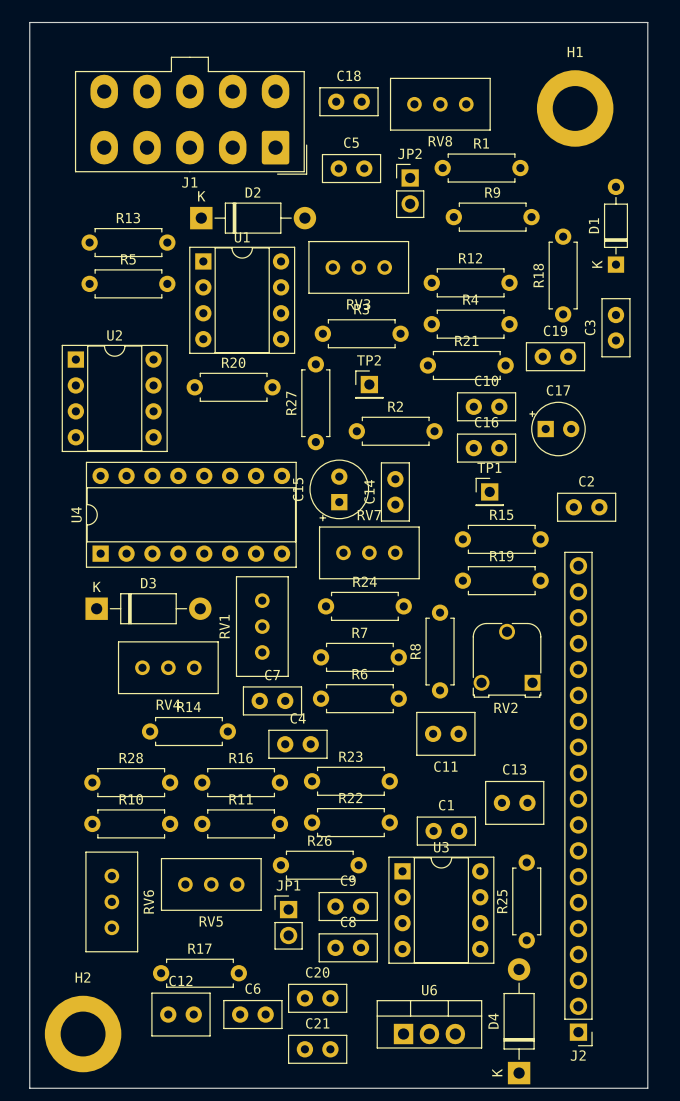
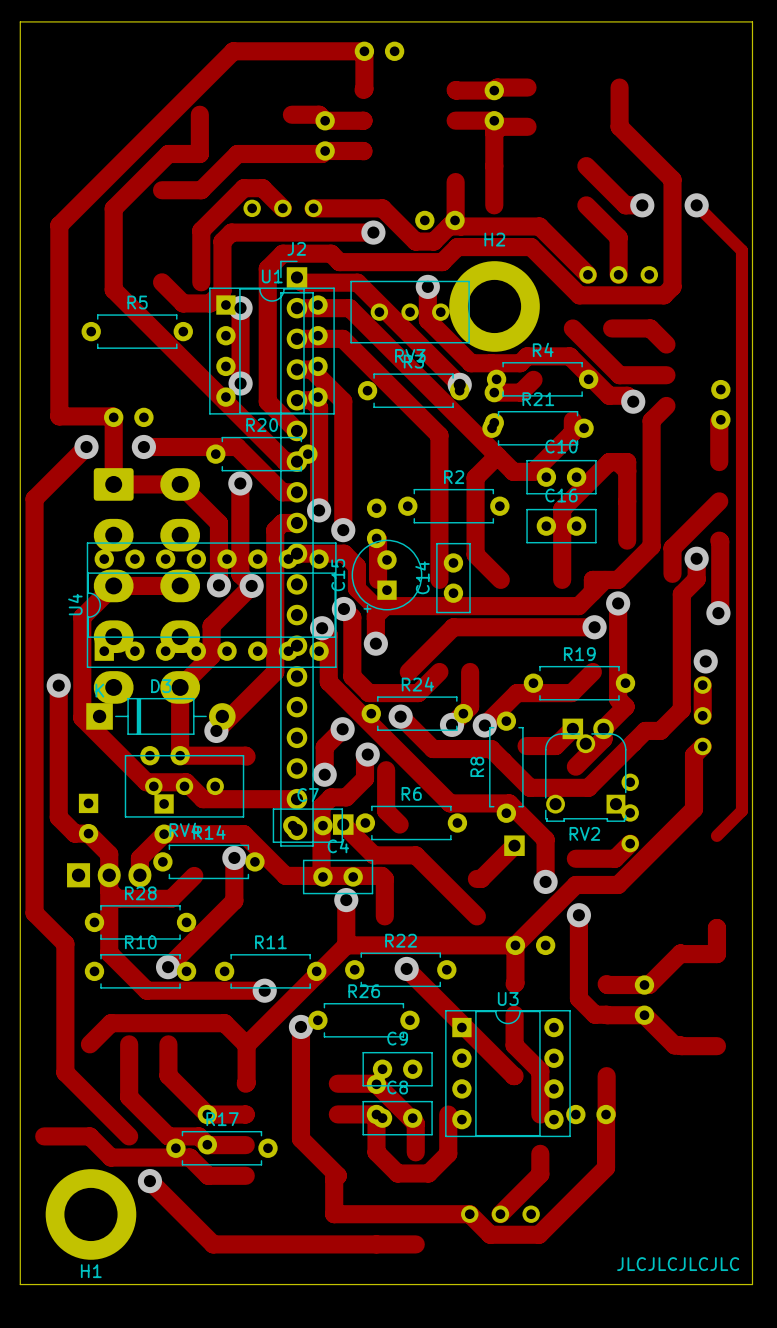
part: none -> (379, 51)
H1 name position: H1 (575, 52) -> H1 (91, 1271)
track: none -> (527, 87) (497, 87) (494, 90) (455, 89)
track: none -> (619, 87) (619, 126) (672, 179) (672, 286) (664, 295) (579, 295) (531, 247) (457, 247) (442, 262) (339, 262) (331, 253) (282, 253) (267, 268) (267, 401) (296, 430)
track: none -> (363, 89) (364, 51) (233, 51) (59, 225) (59, 416) (112, 416) (113, 484) (180, 484) (218, 523) (218, 585)
track: none -> (199, 114) (199, 154) (168, 154) (113, 208) (113, 289) (285, 461) (296, 461)
track: none -> (291, 114) (319, 114) (325, 120) (363, 120)
C18 side: top (348, 101) -> bottom (494, 105)
RV8: (440, 104) -> none
track: none -> (455, 120) (494, 120) (500, 126)
track: none -> (494, 120) (494, 205)
H1 position: (575, 108) -> (90, 1214)
track: none -> (500, 126) (527, 126)
J1: (191, 115) -> none
part: none -> (325, 135)
track: none -> (363, 151) (325, 150) (322, 154) (237, 154) (201, 190) (162, 190)
track: none -> (586, 166) (625, 205) (642, 205)
track: none -> (455, 182) (455, 219) (433, 241) (415, 241) (382, 208) (313, 208)
C5 side: top (351, 168) -> bottom (494, 407)
R1: (481, 168) -> none
track: none -> (586, 205) (618, 237) (618, 274)
via: none -> (642, 205)
track: none -> (696, 205) (741, 250) (741, 810) (716, 835)
via: none -> (696, 205)
track: none -> (282, 208) (262, 188) (243, 188) (201, 230) (201, 282)
part: none -> (282, 208)
part: none -> (439, 220)
JP2: (410, 190) -> none
track: none -> (448, 226) (539, 226) (587, 274)
track: none -> (373, 232) (231, 232) (222, 241) (222, 291) (210, 303) (183, 303) (162, 282)
via: none -> (373, 232)
R9: (492, 217) -> none
D2: (253, 218) -> none
D1: (615, 225) -> none
part: none -> (618, 274)
track: none -> (296, 277) (302, 282) (357, 282) (459, 384)
R13: (128, 242) -> none
track: none -> (427, 286) (427, 320) (471, 363) (520, 363) (527, 356) (569, 356) (609, 395) (627, 395) (633, 401)
via: none -> (427, 286)
track: none -> (240, 308) (240, 383)
via: none -> (240, 308)
track: none -> (296, 308) (349, 308) (513, 471) (533, 471) (572, 432) (572, 420)
R18: (563, 275) -> none
track: none -> (572, 328) (619, 375) (666, 375)
track: none -> (612, 328) (650, 328) (666, 344)
R12: (470, 282) -> none
track: none -> (296, 338) (342, 338) (439, 435) (439, 579)
track: none -> (296, 369) (311, 369) (343, 401) (343, 530)
track: none -> (533, 379) (520, 392) (494, 392)
via: none -> (240, 383)
C3: (615, 327) -> none
via: none -> (459, 384)
track: none -> (296, 400) (311, 400) (319, 407) (319, 510)
via: none -> (633, 401)
part: none -> (720, 404)
track: none -> (666, 405) (651, 420) (651, 546) (618, 579) (592, 579) (592, 591)
part: none -> (128, 417)
C19: (555, 356) -> none
track: none -> (720, 419) (719, 421) (719, 462)
track: none -> (86, 446) (34, 498) (34, 913) (65, 943) (65, 1072) (129, 1136)
via: none -> (86, 446)
track: none -> (143, 446) (237, 446) (282, 492) (296, 492)
via: none -> (143, 446)
TP2: (369, 384) -> none
track: none -> (497, 455) (475, 477) (475, 554) (500, 579)
U2: (114, 398) -> none
R27: (315, 403) -> none
track: none -> (240, 483) (240, 574) (251, 585) (211, 626) (211, 656) (180, 687) (180, 755) (246, 756)
via: none -> (240, 483)
track: none -> (719, 501) (672, 548) (672, 573)
C17: (557, 429) -> none
via: none -> (319, 510)
track: none -> (296, 522) (282, 522) (275, 530) (275, 672) (216, 730)
part: none -> (376, 523)
via: none -> (343, 530)
track: none -> (376, 538) (378, 579)
track: none -> (627, 540) (627, 462) (609, 462) (562, 509) (562, 579)
track: none -> (719, 540) (720, 611) (718, 613)
track: none -> (296, 553) (344, 553) (356, 566) (356, 588) (375, 607) (375, 643)
track: none -> (696, 558) (696, 579) (681, 594) (681, 709) (660, 730) (645, 730) (588, 787) (530, 787) (491, 749) (433, 749) (400, 716)
via: none -> (696, 558)
TP1: (489, 491) -> none
track: none -> (604, 579) (578, 606) (374, 606)
part: none -> (146, 585)
track: none -> (180, 585) (113, 585) (82, 617) (82, 717) (146, 782) (186, 782) (203, 799) (296, 799)
via: none -> (218, 585)
via: none -> (251, 585)
C2: (586, 507) -> none
track: none -> (618, 603) (618, 699) (625, 706) (603, 728) (603, 739) (575, 766)
via: none -> (618, 603)
track: none -> (343, 608) (352, 617) (352, 676) (368, 693) (418, 693) (439, 671)
via: none -> (343, 608)
via: none -> (718, 613)
track: none -> (594, 627) (453, 627) (408, 671)
via: none -> (594, 627)
track: none -> (322, 628) (328, 634) (328, 682) (450, 803) (509, 803) (545, 839) (545, 881)
via: none -> (322, 628)
R15: (501, 539) -> none
via: none -> (375, 643)
RV7: (369, 552) -> none
via: none -> (705, 661)
track: none -> (470, 671) (470, 706) (452, 724)
track: none -> (592, 671) (571, 693) (517, 693) (484, 725)
track: none -> (58, 685) (58, 817) (74, 833) (88, 833) (109, 854) (109, 953) (146, 990) (264, 990)
via: none -> (58, 685)
track: none -> (702, 685) (702, 715)
via: none -> (400, 716)
part: none -> (702, 715)
via: none -> (452, 724)
via: none -> (484, 725)
track: none -> (342, 729) (324, 747) (324, 774)
via: none -> (342, 729)
track: none -> (572, 728) (555, 746) (526, 746)
part: none -> (588, 728)
via: none -> (216, 730)
RV1: (262, 626) -> none
track: none -> (702, 746) (694, 755) (694, 809) (618, 884) (575, 884) (515, 945)
track: none -> (367, 754) (365, 757) (365, 778) (346, 797) (331, 797) (321, 807) (321, 871) (317, 875)
via: none -> (367, 754)
part: none -> (165, 755)
track: none -> (386, 770) (386, 811) (399, 824)
via: none -> (324, 774)
R7: (359, 657) -> none
part: none -> (630, 812)
part: none -> (88, 818)
part: none -> (164, 819)
track: none -> (343, 824) (374, 855) (415, 855) (476, 916)
part: none -> (343, 824)
track: none -> (630, 843) (615, 858) (575, 858)
track: none -> (514, 845) (481, 878) (476, 878)
part: none -> (514, 845)
track: none -> (234, 857) (234, 900) (168, 967)
via: none -> (234, 857)
C11: (445, 733) -> none
part: none -> (109, 875)
track: none -> (139, 875) (139, 858) (164, 834) (243, 834) (285, 875) (381, 875) (384, 878) (384, 916)
track: none -> (194, 875) (171, 898) (117, 898) (109, 890)
via: none -> (545, 881)
track: none -> (346, 900) (346, 945)
via: none -> (346, 900)
track: none -> (578, 915) (578, 998) (595, 1014) (644, 1015) (674, 1045) (716, 1046)
via: none -> (578, 915)
R23: (350, 781) -> none
R16: (241, 782) -> none
track: none -> (716, 928) (716, 954) (680, 953) (649, 985) (606, 984)
J2 rotation: 0° (578, 799) -> 180° (296, 553)
J2 position: (578, 799) -> (296, 553)
track: none -> (346, 945) (515, 945)
track: none -> (346, 945) (246, 1045)
track: none -> (515, 945) (514, 984)
part: none -> (530, 945)
C13: (514, 802) -> none
via: none -> (168, 967)
track: none -> (406, 968) (514, 1076)
via: none -> (406, 968)
C1: (446, 831) -> none
via: none -> (264, 990)
part: none -> (644, 1000)
track: none -> (514, 1014) (514, 1045) (540, 1071) (540, 1114)
track: none -> (300, 1026) (300, 1138) (337, 1175) (334, 1179) (334, 1214) (469, 1214) (490, 1234) (539, 1234) (606, 1167) (606, 1076)
via: none -> (300, 1026)
RV5: (211, 884) -> none
track: none -> (89, 1044) (111, 1023) (224, 1023) (246, 1045)
track: none -> (129, 1044) (129, 1097) (168, 1136) (199, 1136) (207, 1145) (245, 1145)
track: none -> (168, 1044) (168, 1075) (207, 1114) (245, 1114)
track: none -> (246, 1045) (245, 1083)
RV6: (111, 901) -> none
R25: (526, 901) -> none
track: none -> (337, 1083) (375, 1083) (415, 1123) (415, 1152)
JP1: (288, 922) -> none
track: none -> (337, 1114) (376, 1114)
track: none -> (377, 1114) (376, 1152) (397, 1173) (428, 1173) (448, 1153) (448, 1114)
part: none -> (590, 1114)
track: none -> (44, 1136) (89, 1136) (111, 1157) (189, 1157) (208, 1175) (245, 1175)
track: none -> (540, 1153) (540, 1174) (500, 1214)
C20 side: top (317, 998) -> bottom (376, 1099)
track: none -> (149, 1181) (213, 1244) (415, 1244)
via: none -> (149, 1181)
C12: (181, 1014) -> none
C6: (252, 1014) -> none
D4: (519, 1021) -> none
U6: (429, 1024) -> none
part: none -> (500, 1214)
H2 position: (83, 1034) -> (494, 306)
C21 side: top (317, 1049) -> bottom (207, 1129)
text: none -> JLCJLCJLCJLC (678, 1264)

